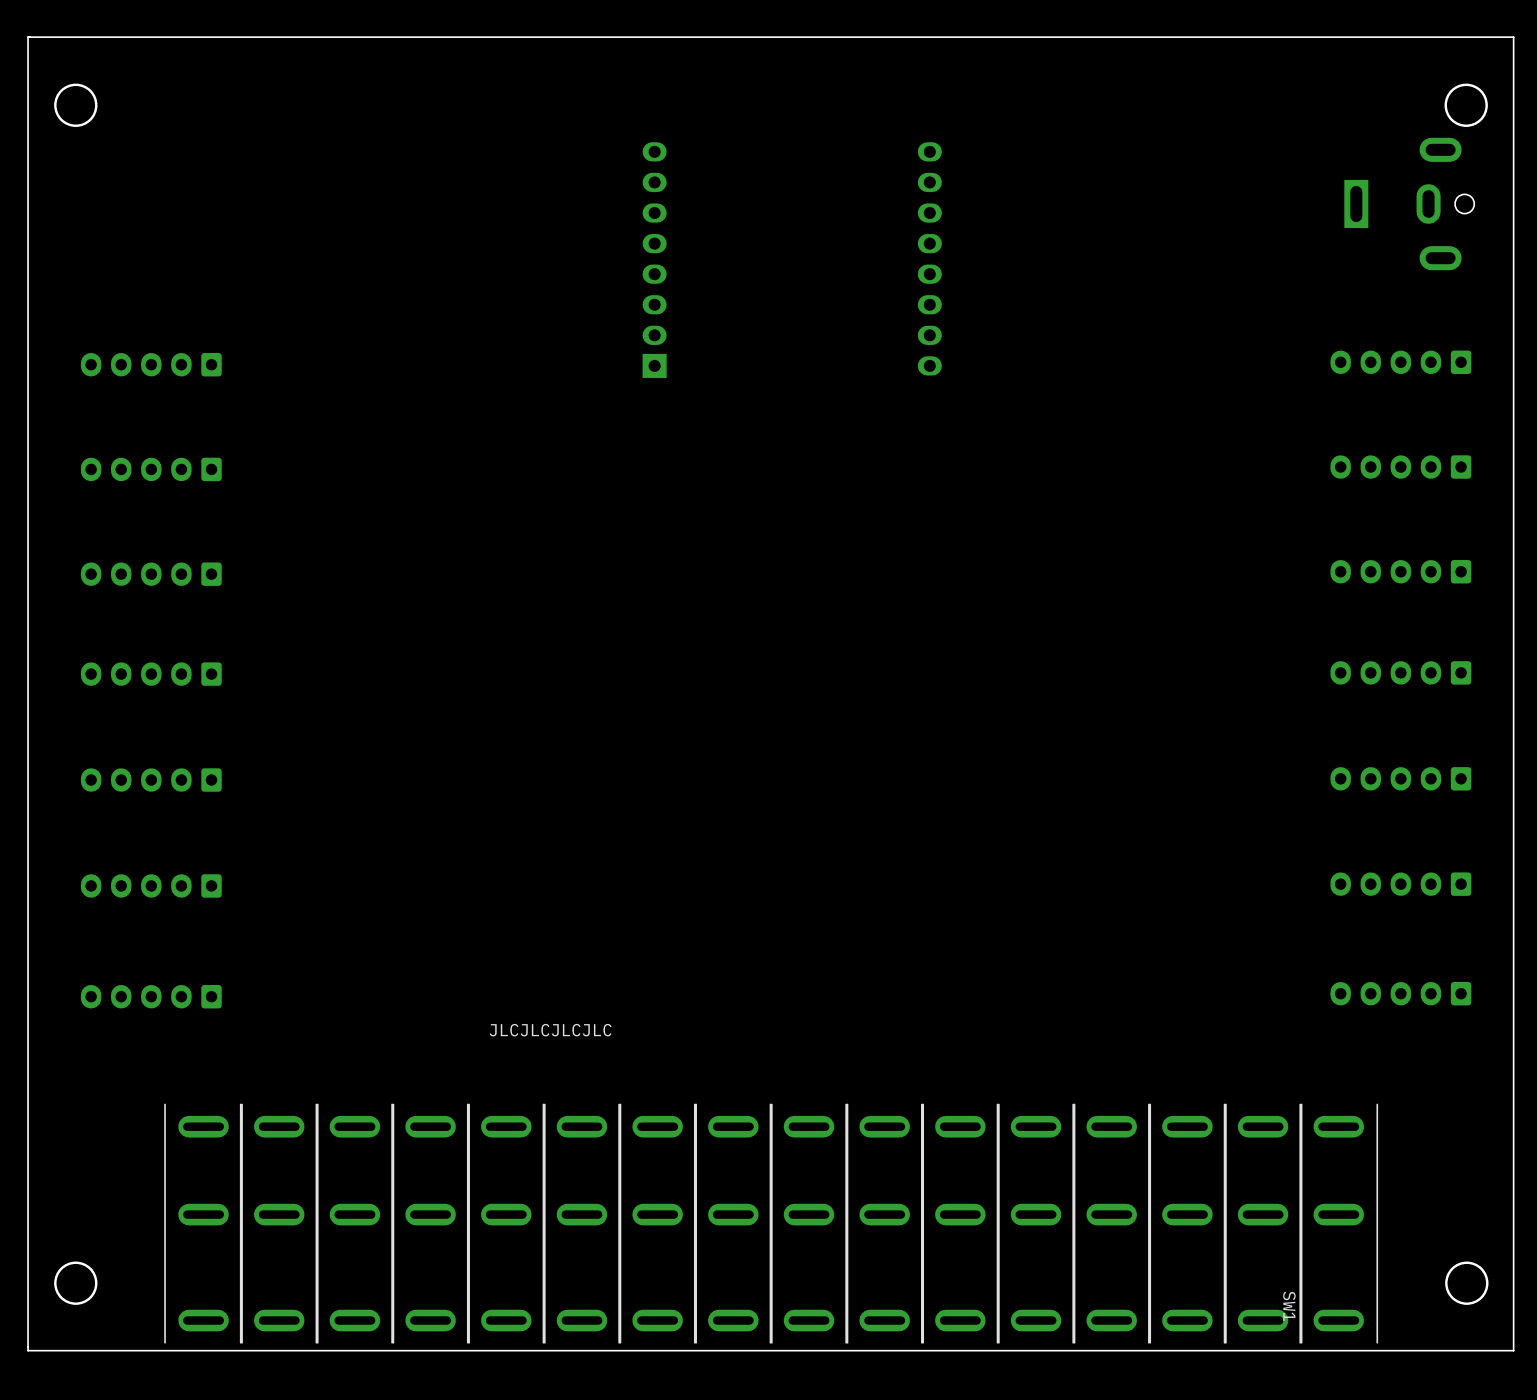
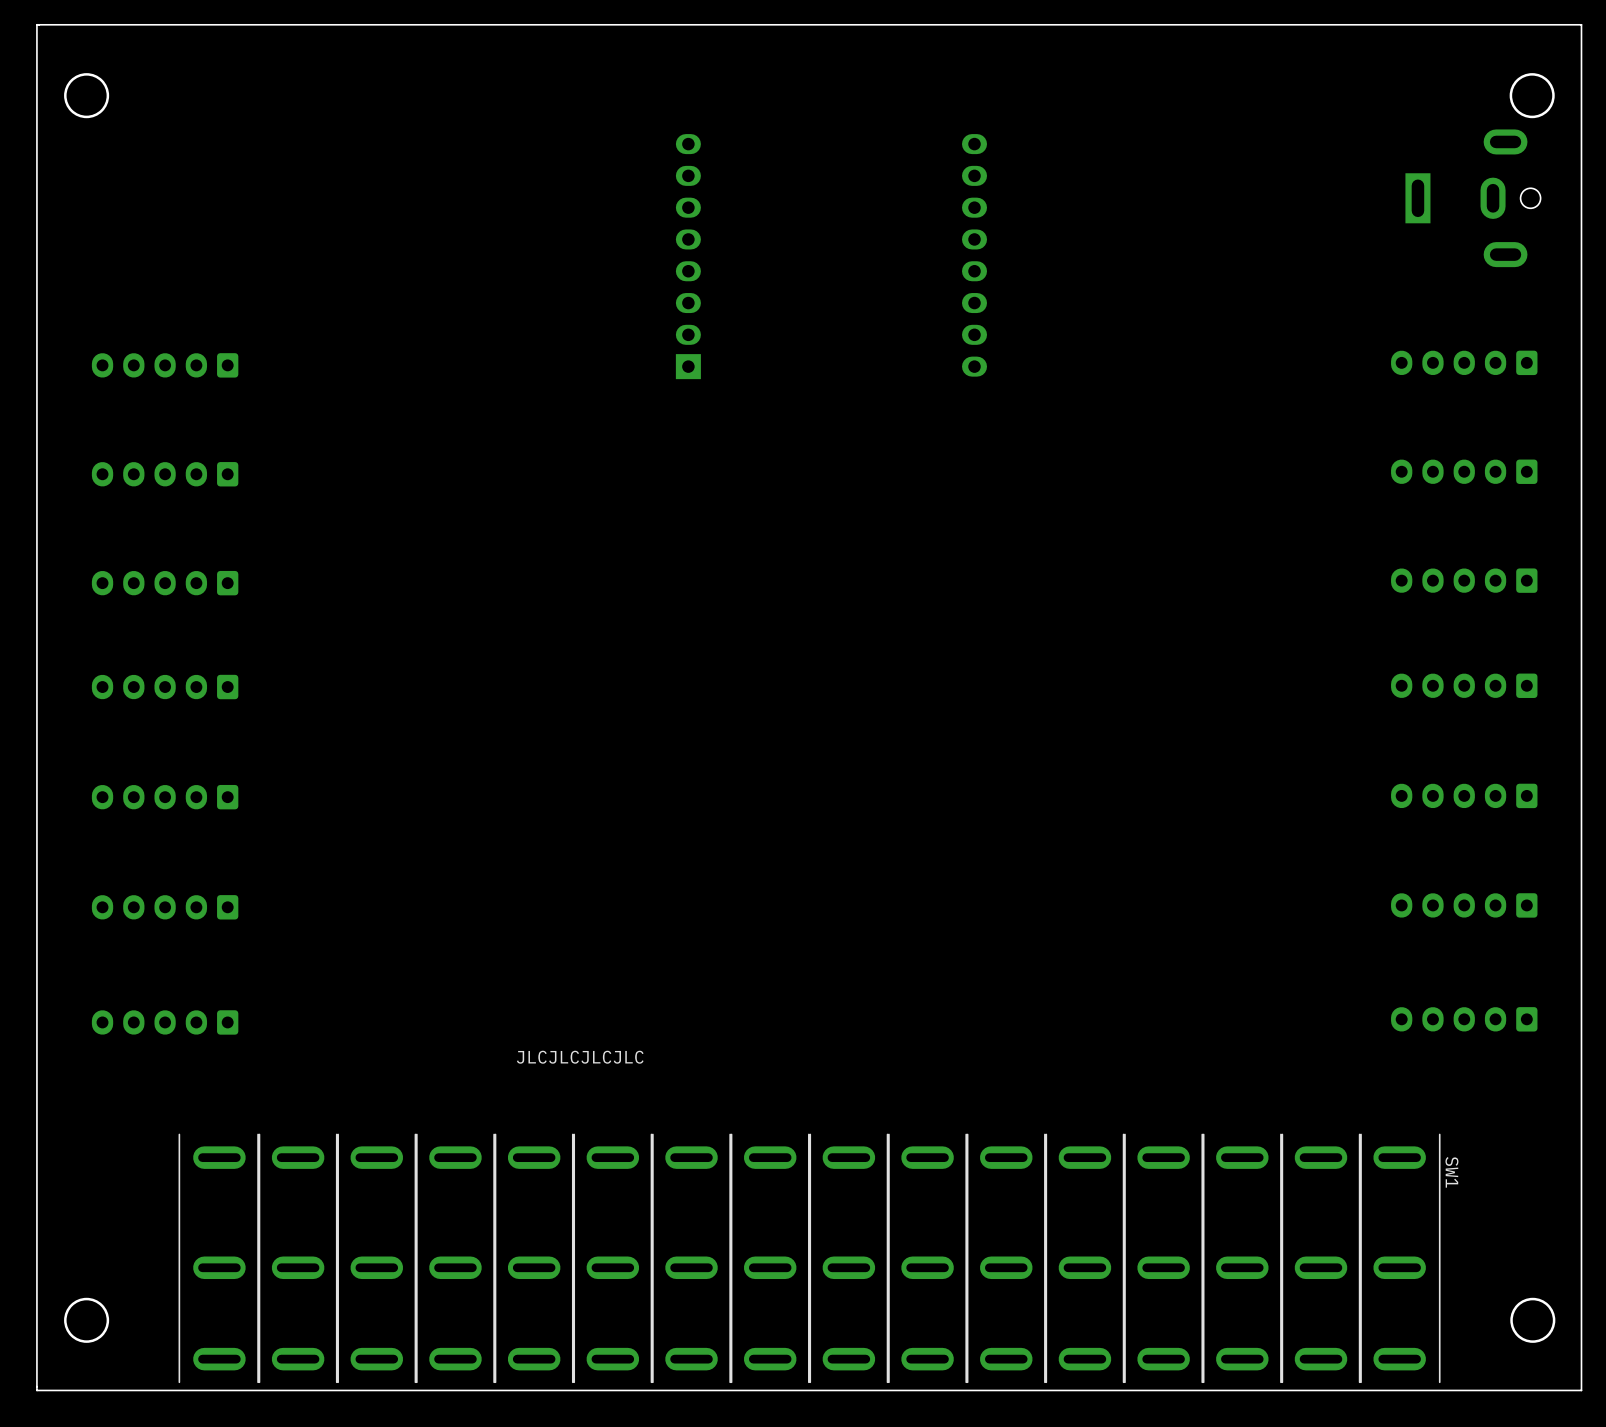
part rotation: 0° (203, 1223) -> 180° (219, 1258)
part rotation: 0° (279, 1223) -> 180° (298, 1258)
part rotation: 0° (354, 1223) -> 180° (376, 1258)
part rotation: 0° (430, 1223) -> 180° (455, 1258)
part rotation: 0° (506, 1223) -> 180° (534, 1258)
part rotation: 0° (581, 1223) -> 180° (612, 1258)
part rotation: 0° (657, 1223) -> 180° (691, 1258)
part rotation: 0° (733, 1223) -> 180° (770, 1258)
part rotation: 0° (808, 1223) -> 180° (848, 1258)
part rotation: 0° (884, 1223) -> 180° (927, 1258)
part rotation: 0° (960, 1223) -> 180° (1006, 1258)
part rotation: 0° (1036, 1223) -> 180° (1084, 1258)
part rotation: 0° (1111, 1223) -> 180° (1163, 1258)
part rotation: 0° (1187, 1223) -> 180° (1242, 1258)
part rotation: 0° (1263, 1223) -> 180° (1320, 1258)
SW1 rotation: 0° (1338, 1223) -> 180° (1399, 1258)

